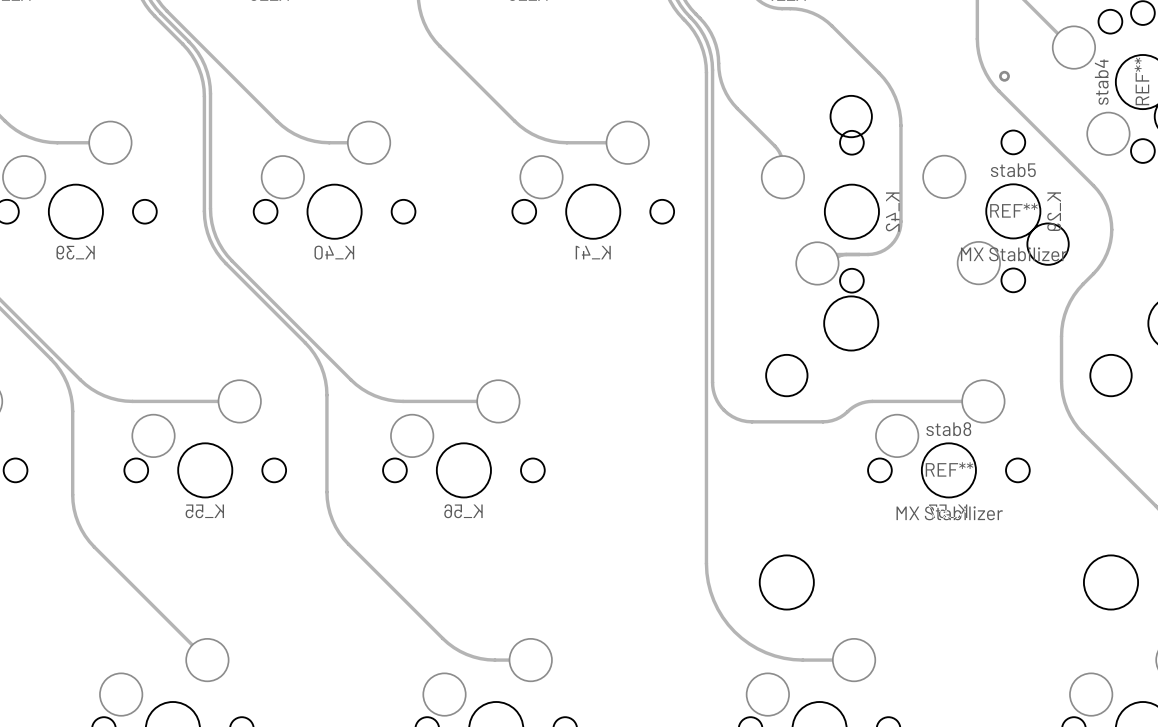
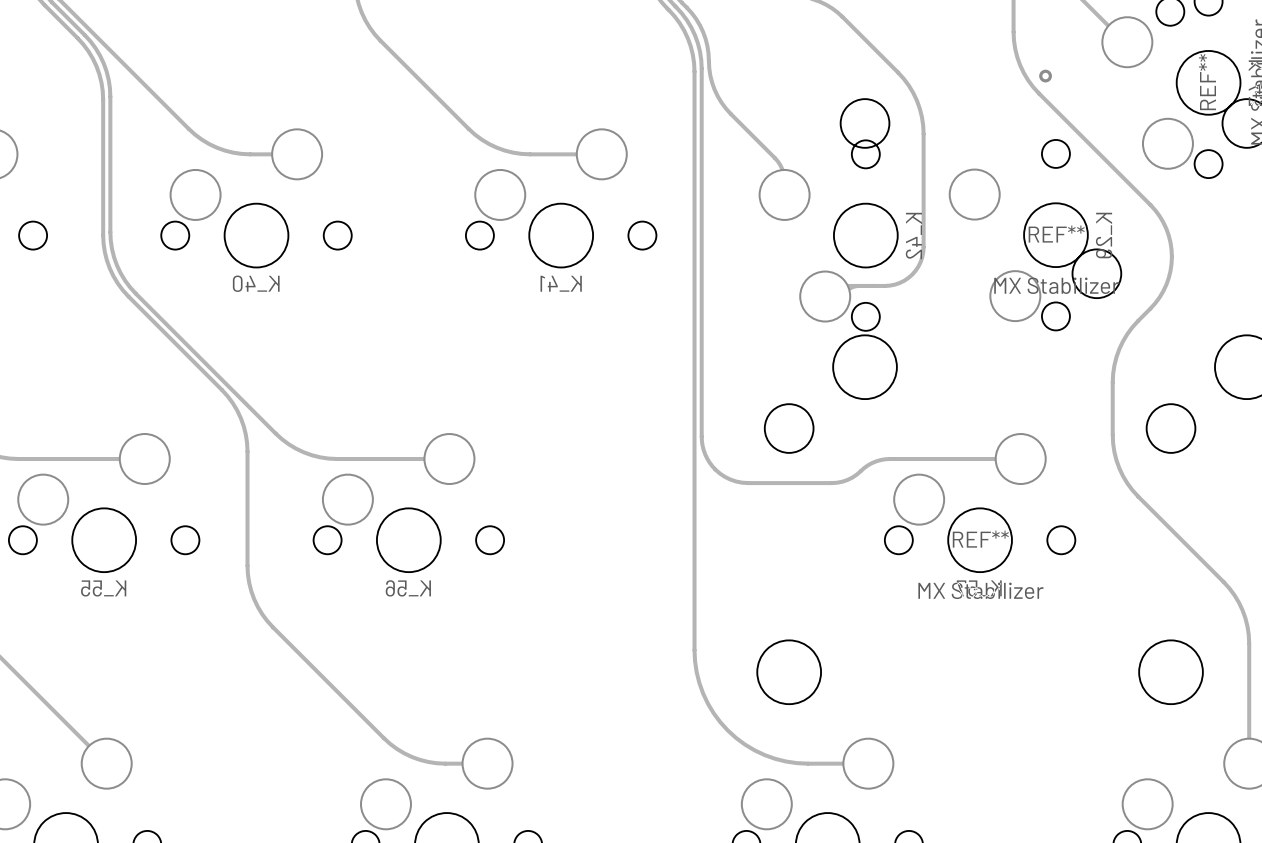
stab4 name: stab4 (1101, 82) -> none
stab5 name: stab5 (1013, 170) -> none
stab8 name: stab8 (948, 429) -> none

